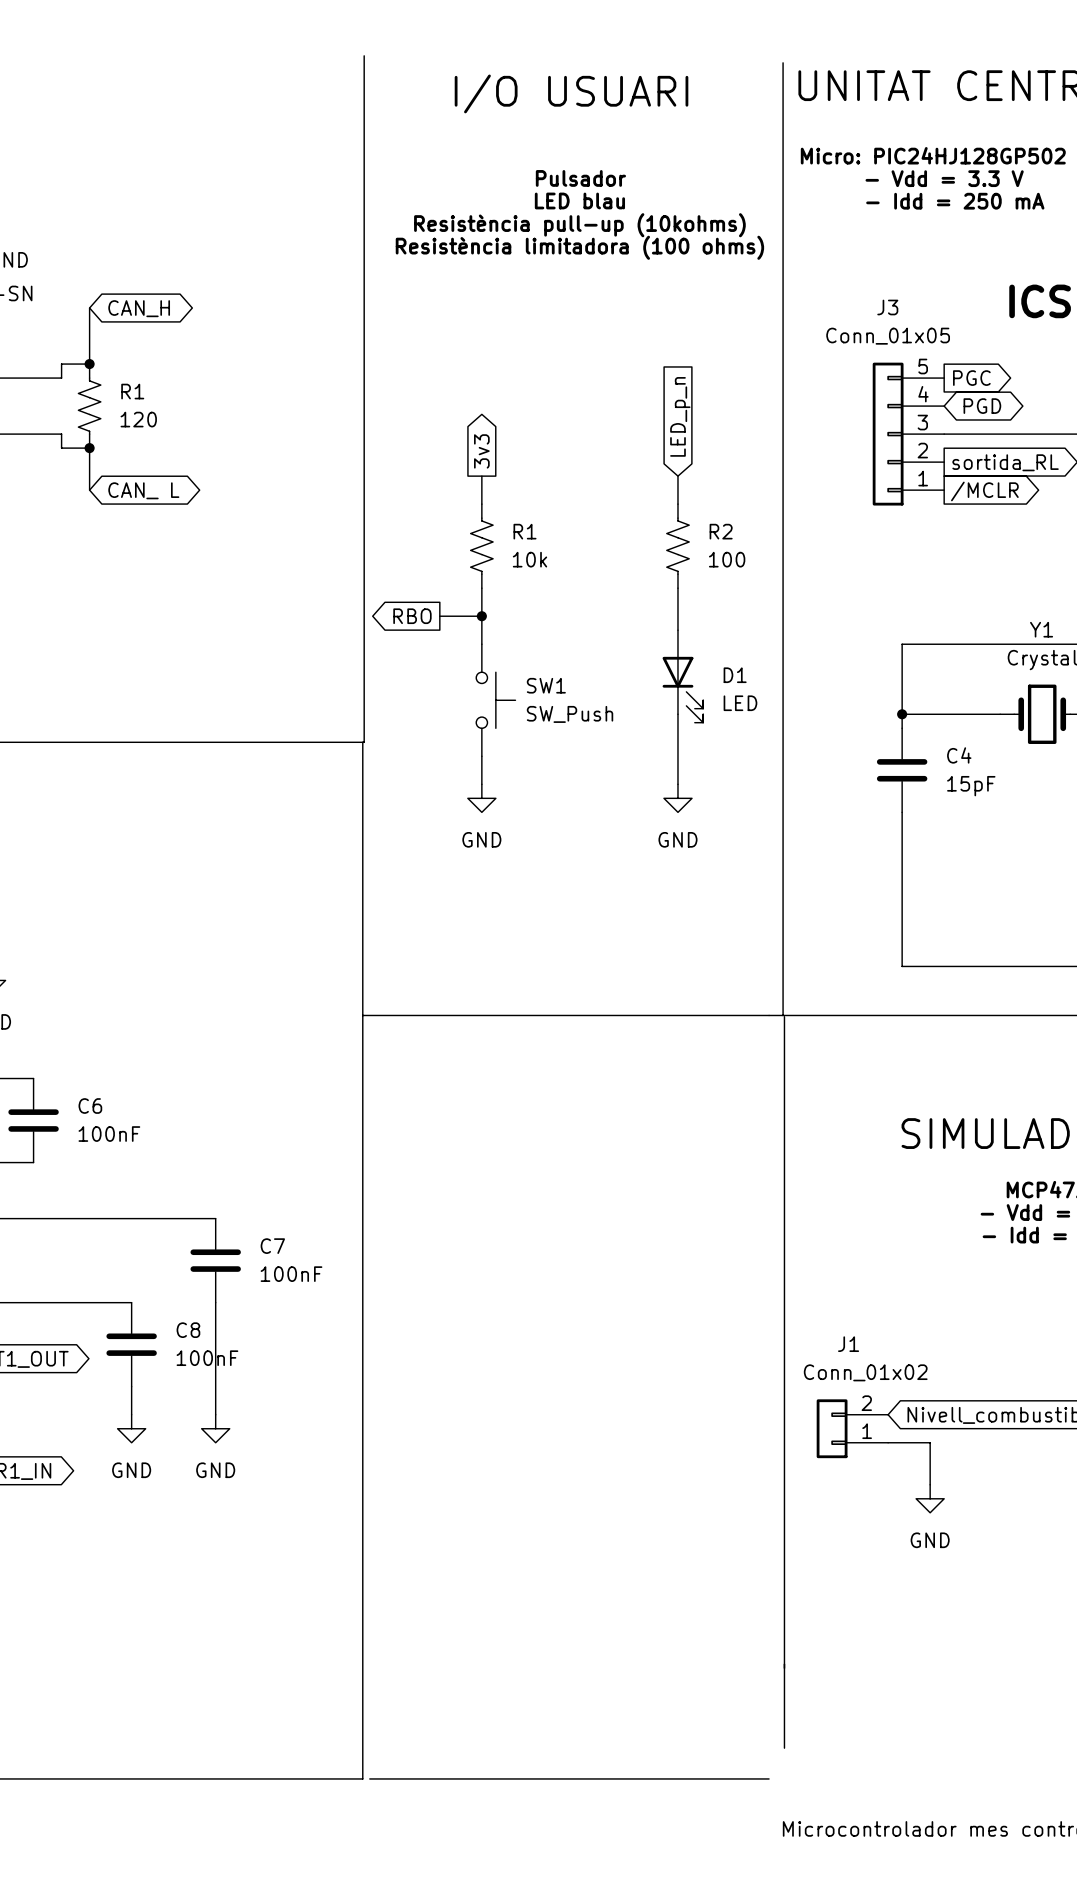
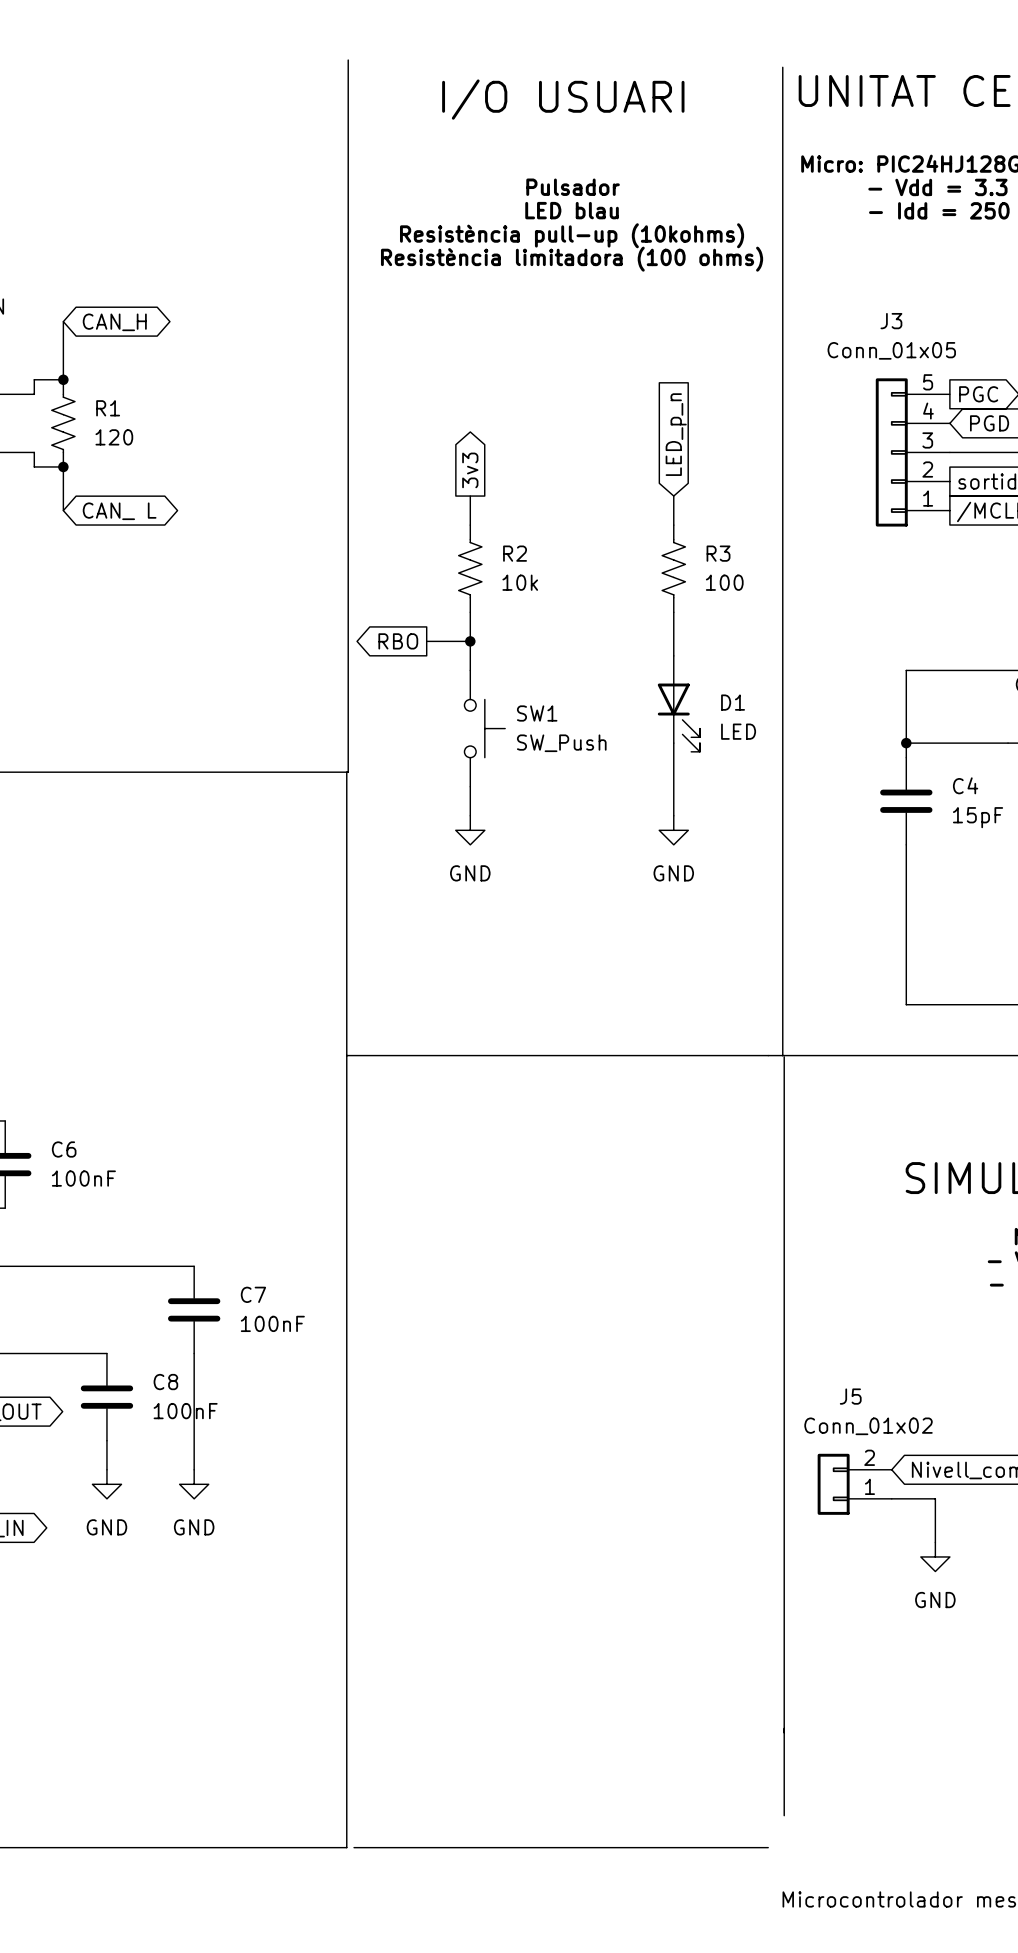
R1 name: R1 (524, 531) -> R2 (515, 553)
R2 name: R2 (721, 531) -> R3 (718, 553)
J1 name: J1 (848, 1344) -> J5 (850, 1396)

